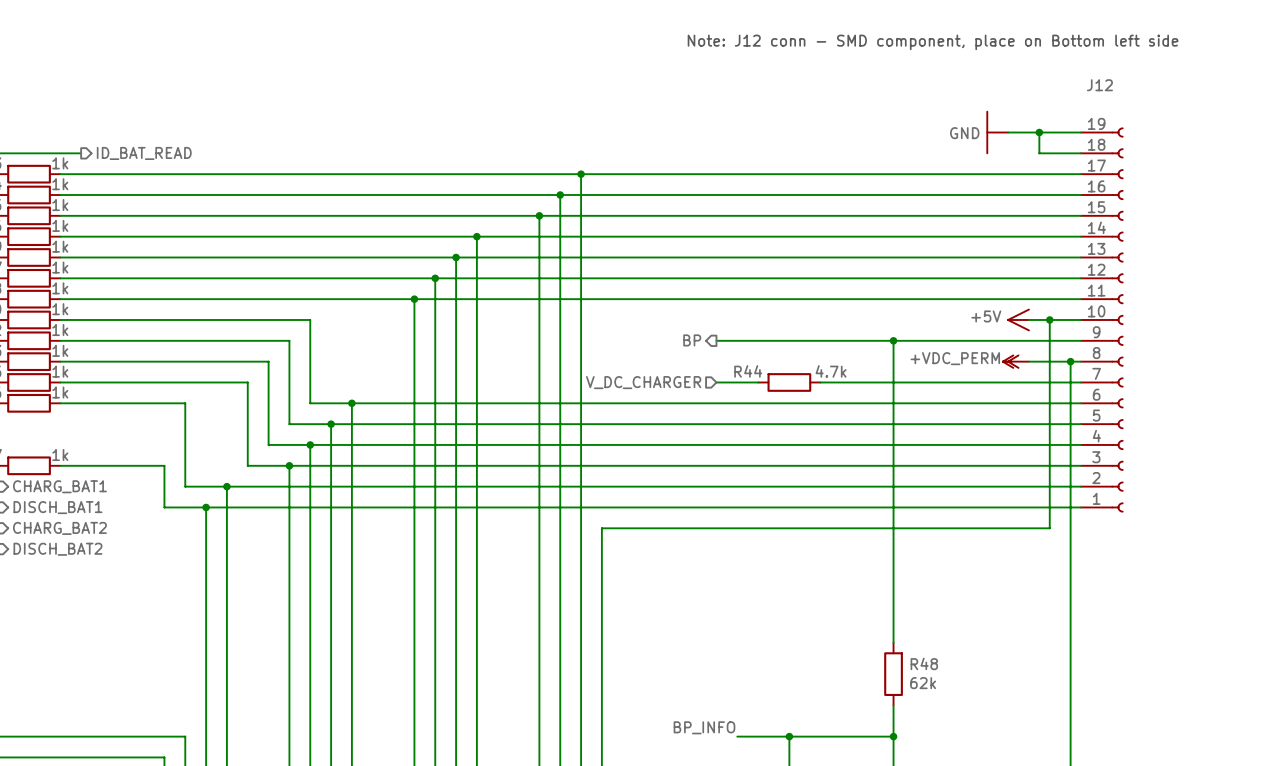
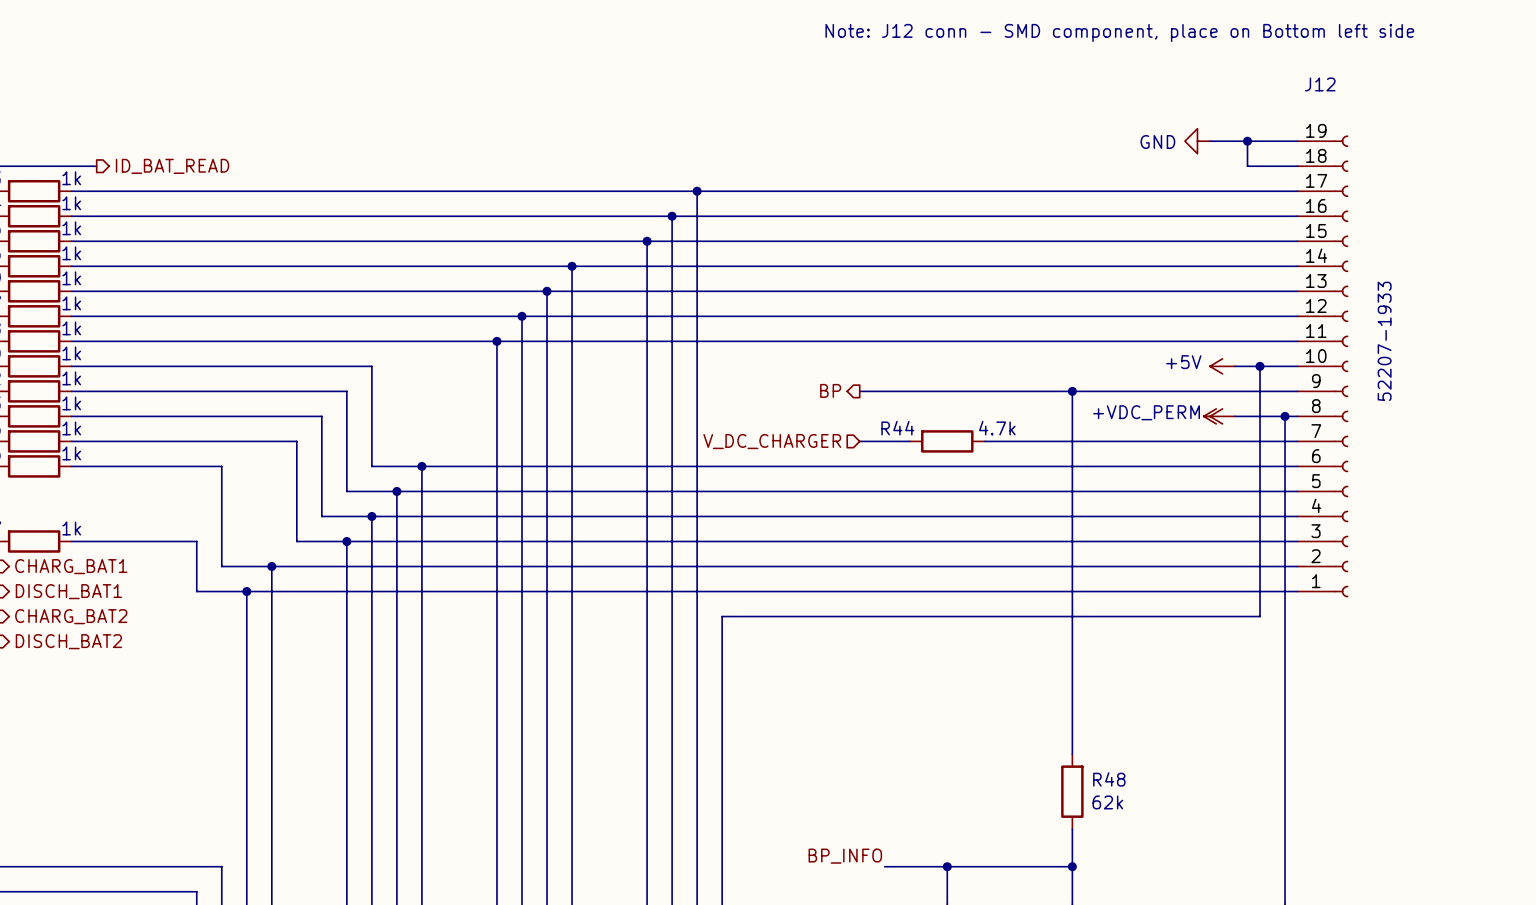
power symbol shape: [987, 111, 1009, 154] -> [1184, 128, 1210, 154]
J12 text: none -> 52207-1933 (1384, 341)
power symbol shape: [1008, 309, 1029, 331] -> [1209, 358, 1235, 374]

